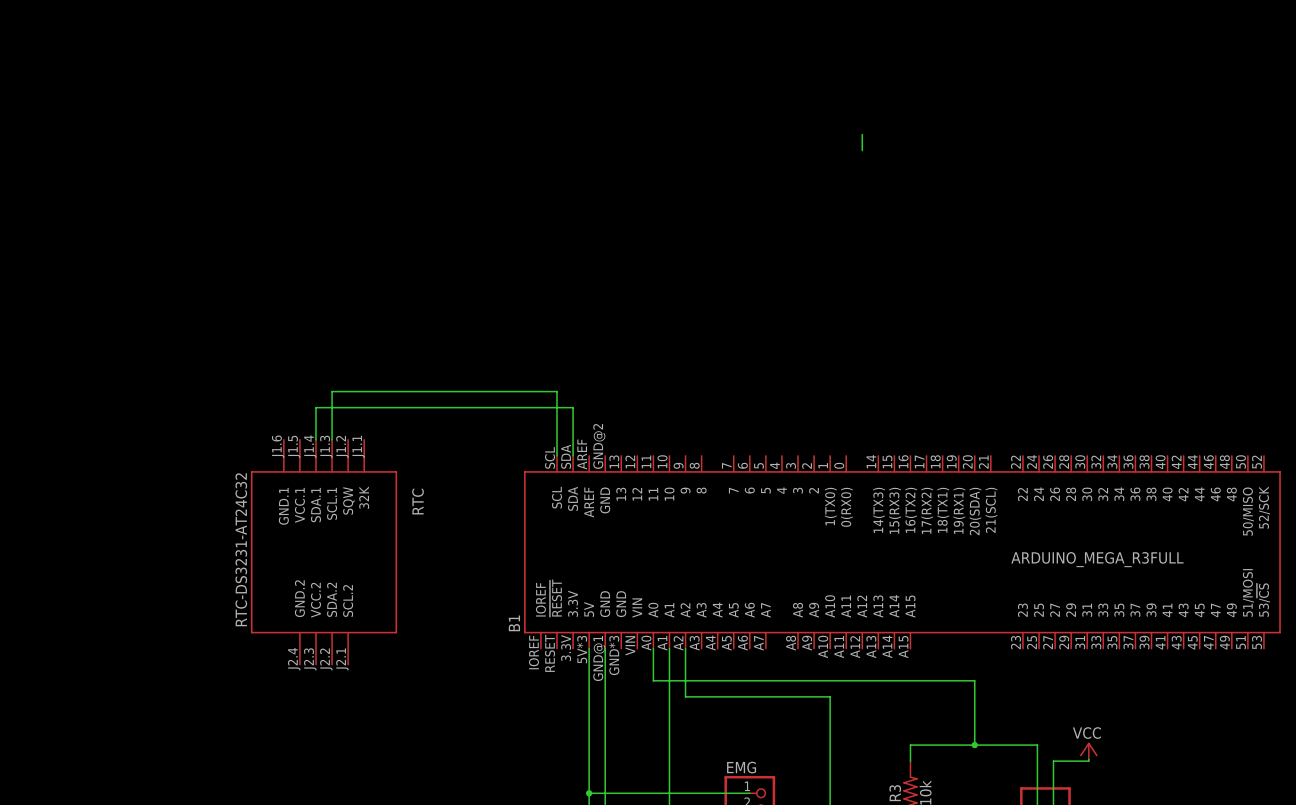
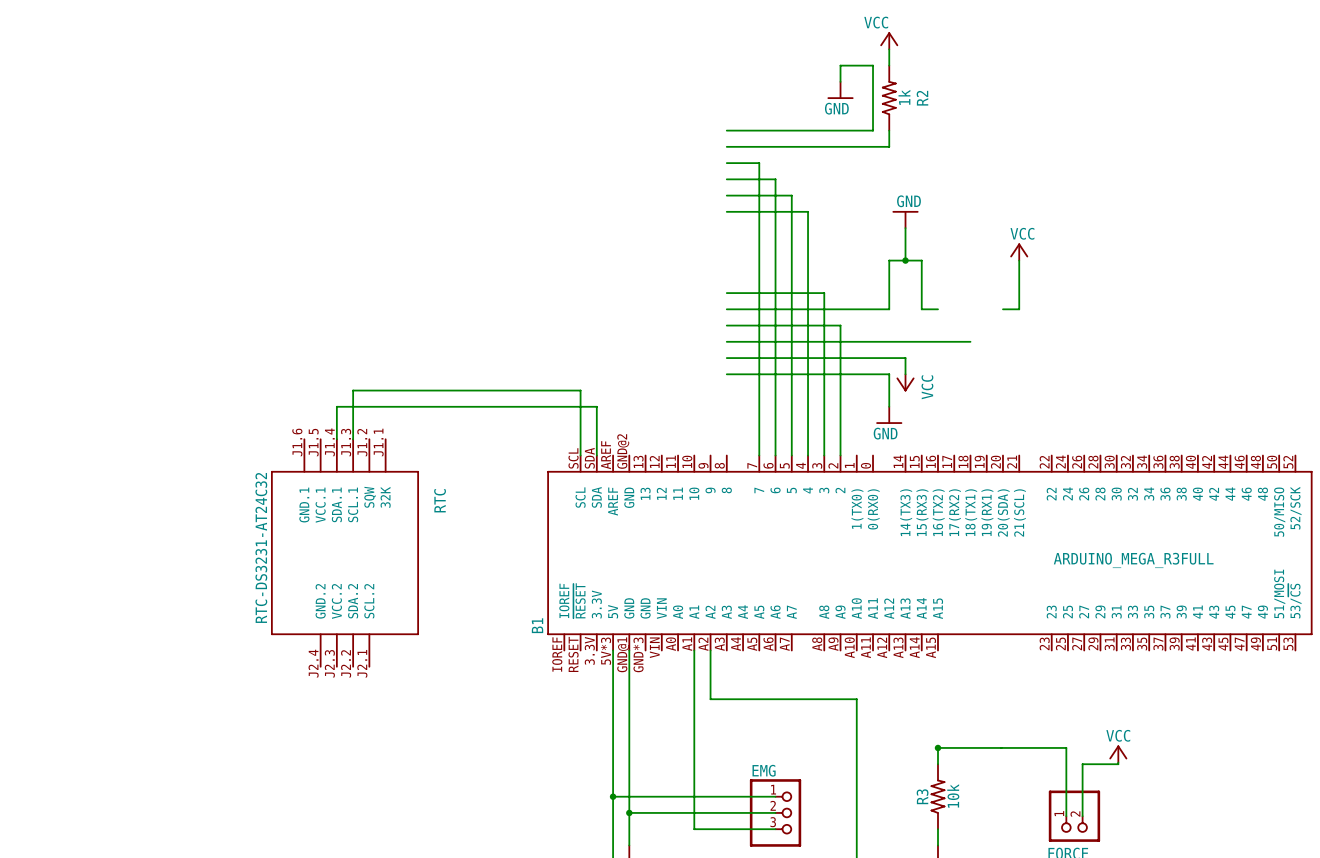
power symbol: none -> VCC (889, 40)
wire: none -> (889, 49) (889, 65)
wire: none -> (840, 81) (840, 65) (873, 65) (873, 130) (726, 130)
power symbol: none -> GND (840, 90)
R2: none -> 1k (889, 98)
wire: none -> (726, 146) (889, 146)
wire: none -> (726, 163) (759, 163) (759, 455)
wire: none -> (726, 179) (775, 179) (775, 455)
wire: none -> (726, 195) (791, 195) (791, 455)
wire: none -> (726, 211) (808, 211) (808, 455)
power symbol: none -> GND (905, 219)
wire: none -> (905, 228) (905, 260)
power symbol: none -> VCC (1019, 252)
junction: none -> (905, 260)
wire: none -> (1019, 260) (1019, 309) (1002, 309)
wire: none -> (726, 293) (824, 293) (824, 455)
wire: none -> (726, 309) (889, 309) (889, 260) (921, 260) (921, 309) (937, 309)
wire: none -> (726, 325) (840, 325) (840, 455)
wire: none -> (726, 341) (970, 341)
wire: none -> (726, 358) (905, 358) (905, 374)
wire: none -> (726, 374) (889, 374) (889, 406)
power symbol: none -> VCC (905, 382)
power symbol: none -> GND (889, 415)
wire: (653, 648) (653, 680) (974, 680) (974, 745) -> none
junction: none -> (937, 747)
junction: (974, 745) -> none

